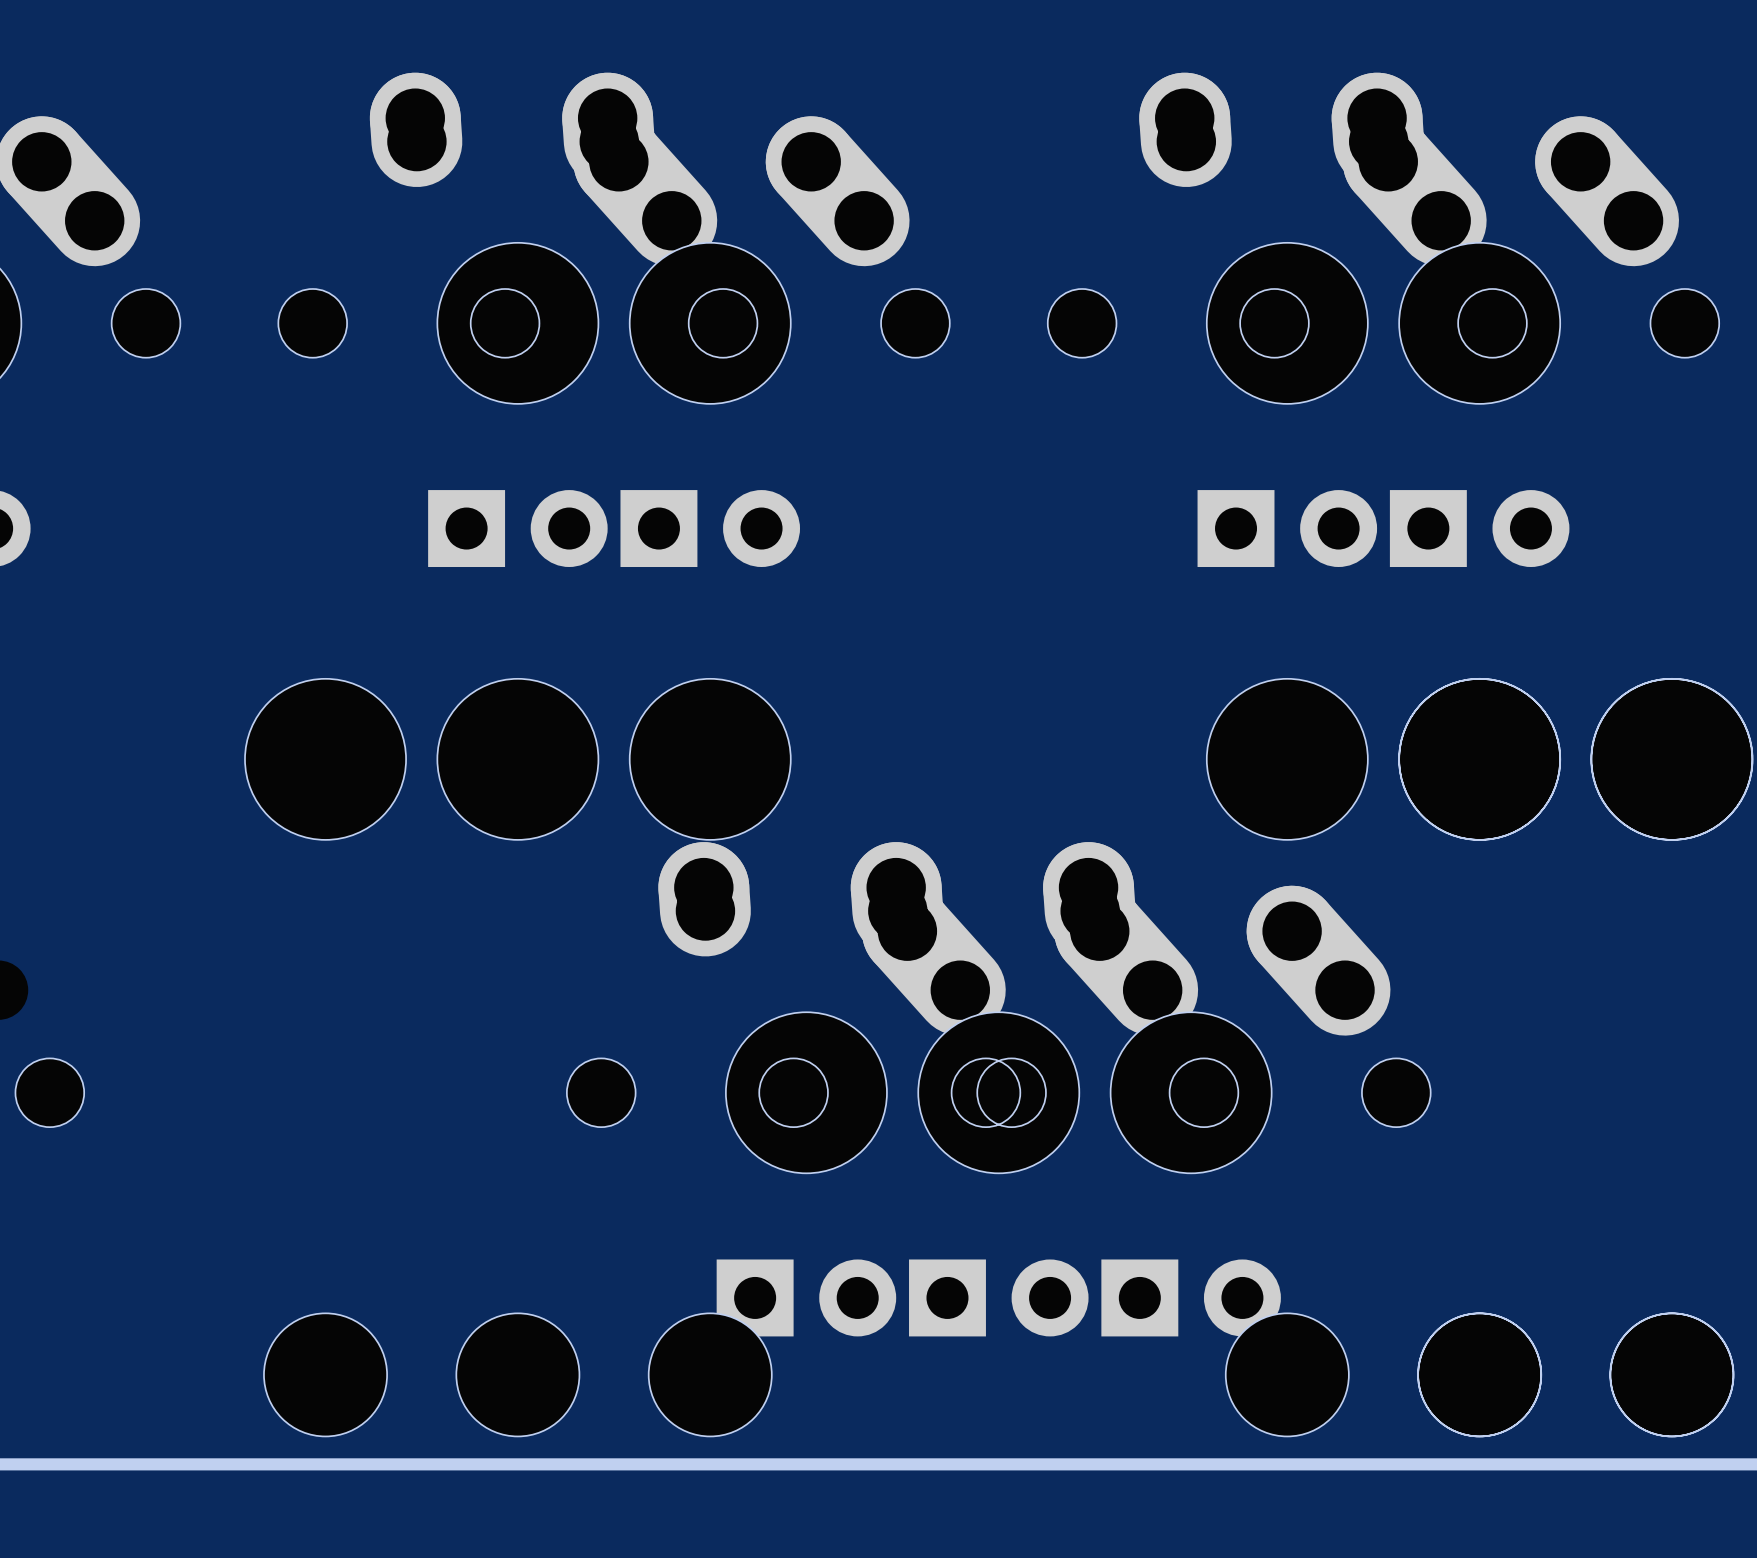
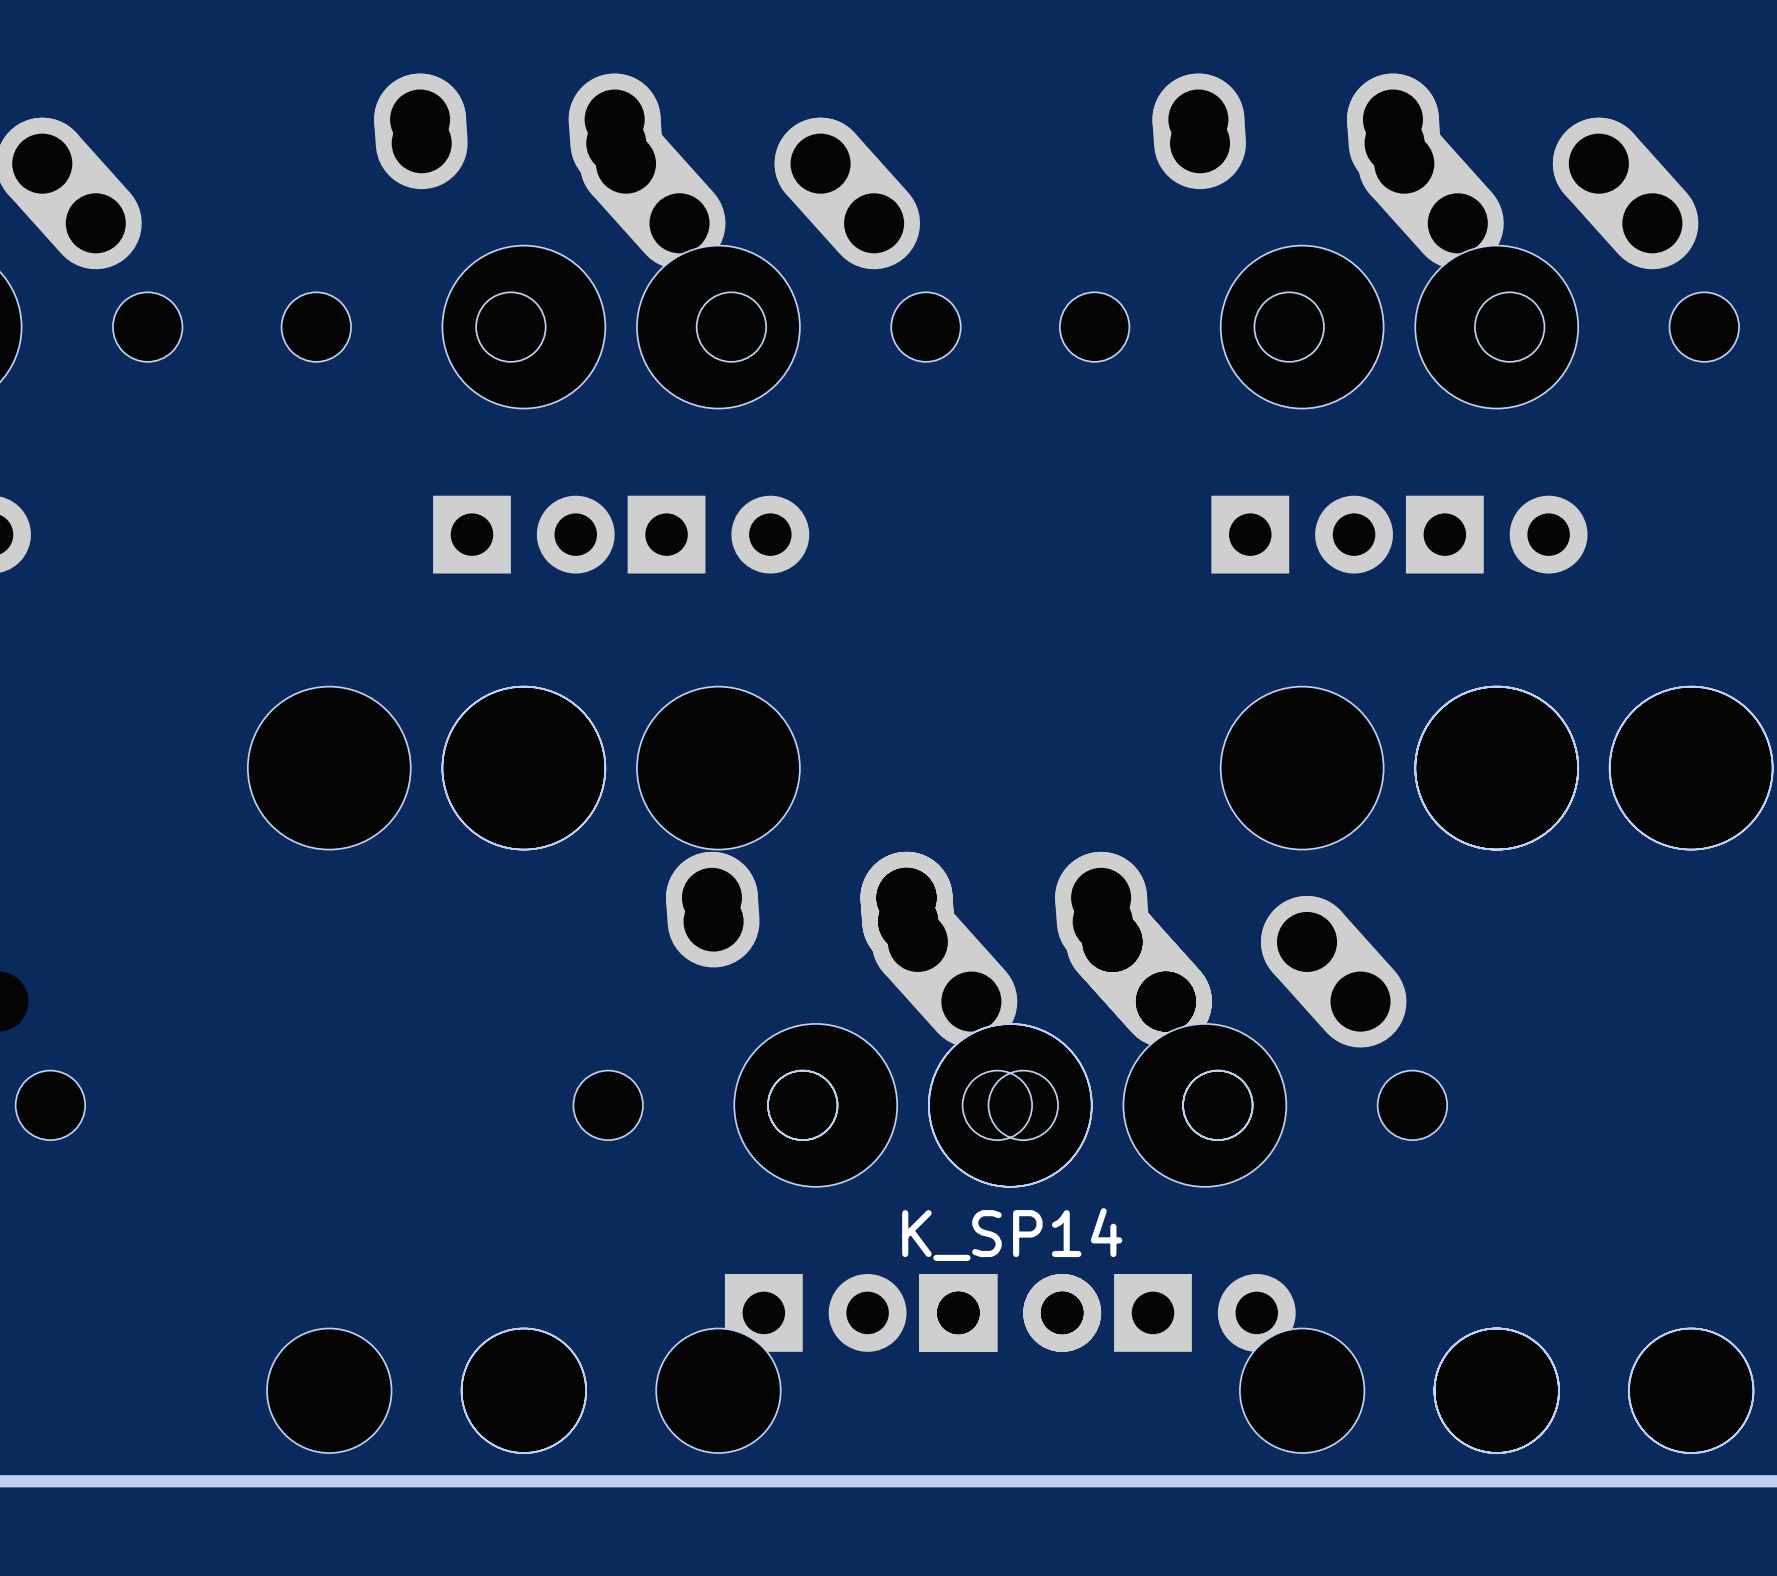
K_SP14: none -> (1010, 1069)

